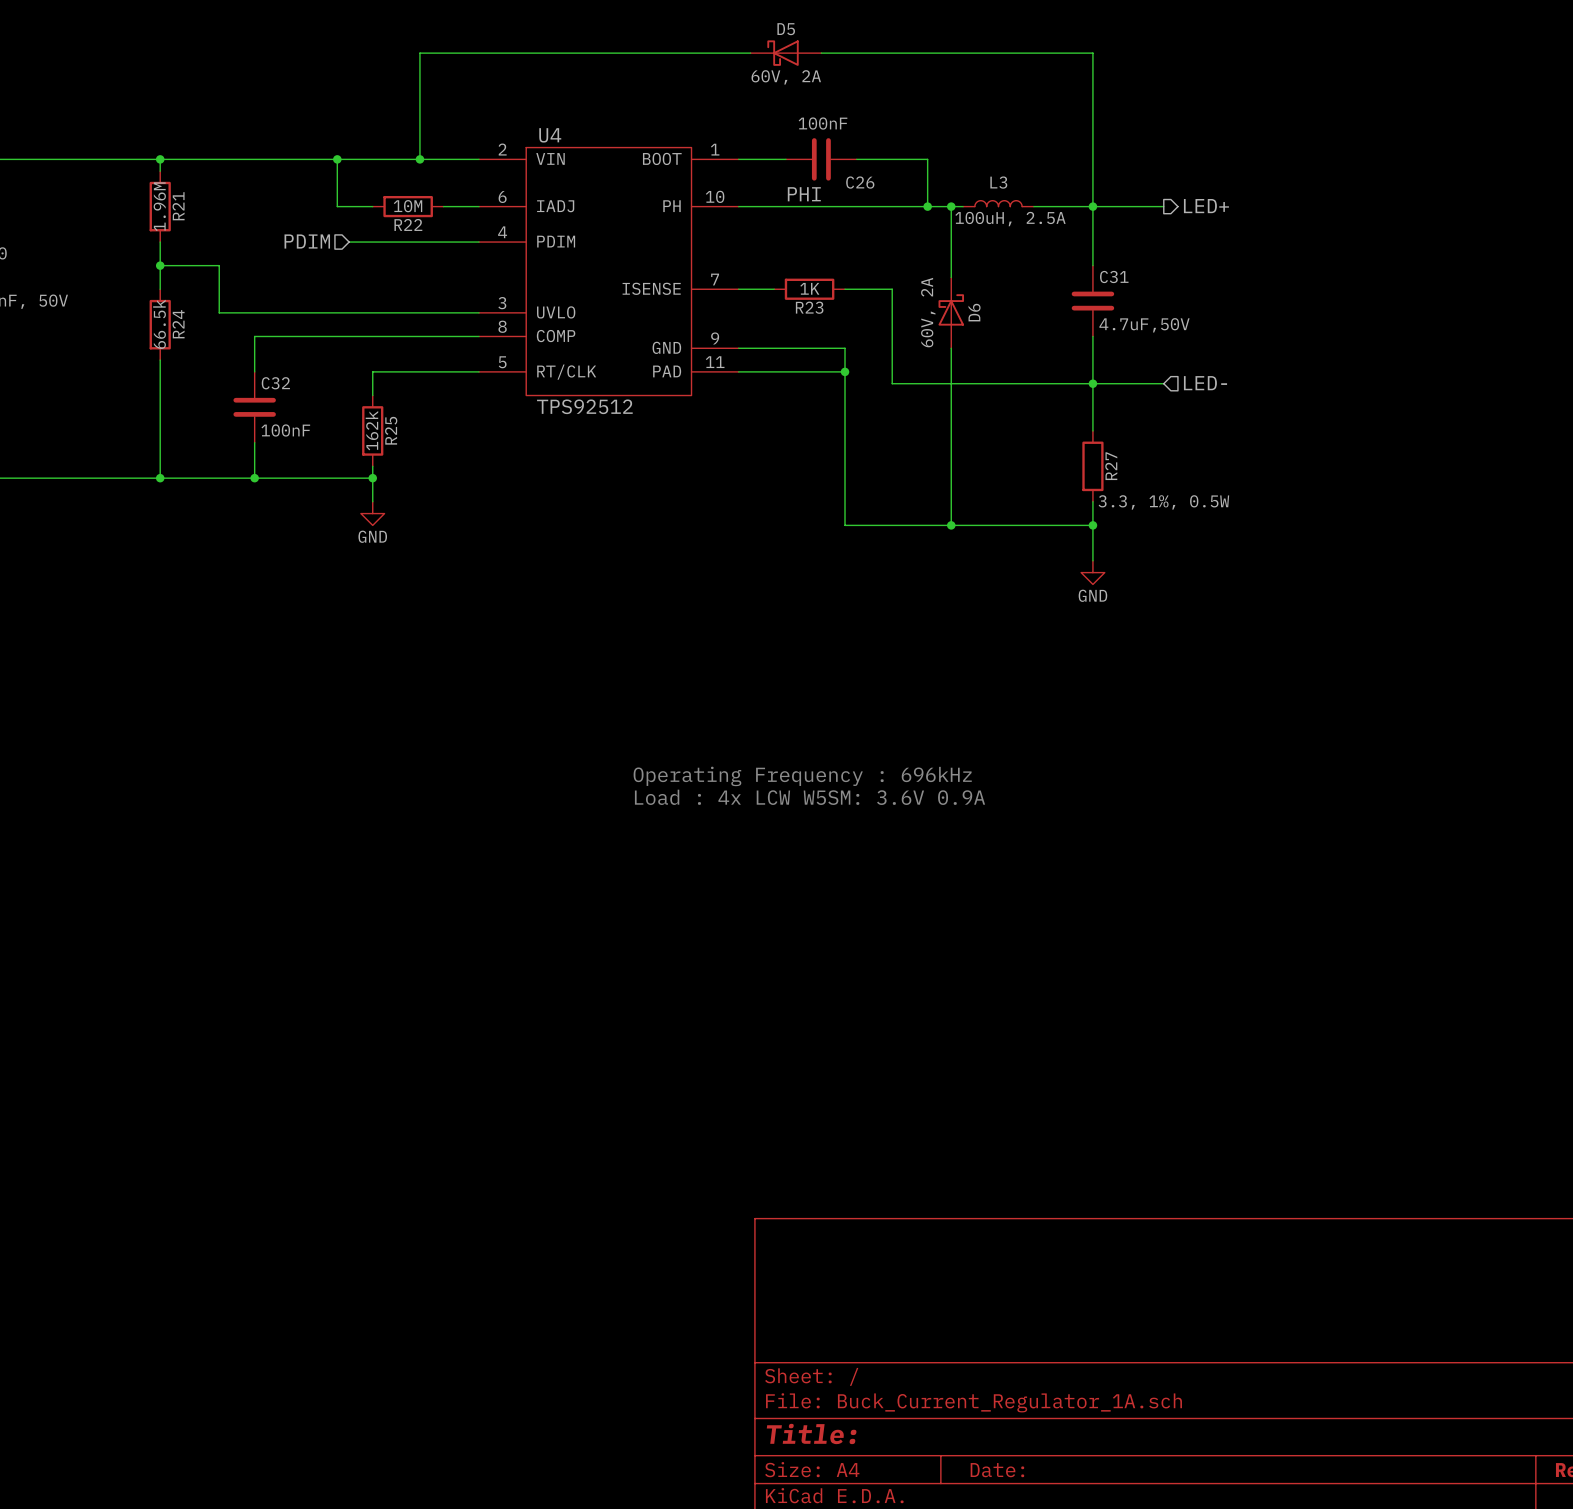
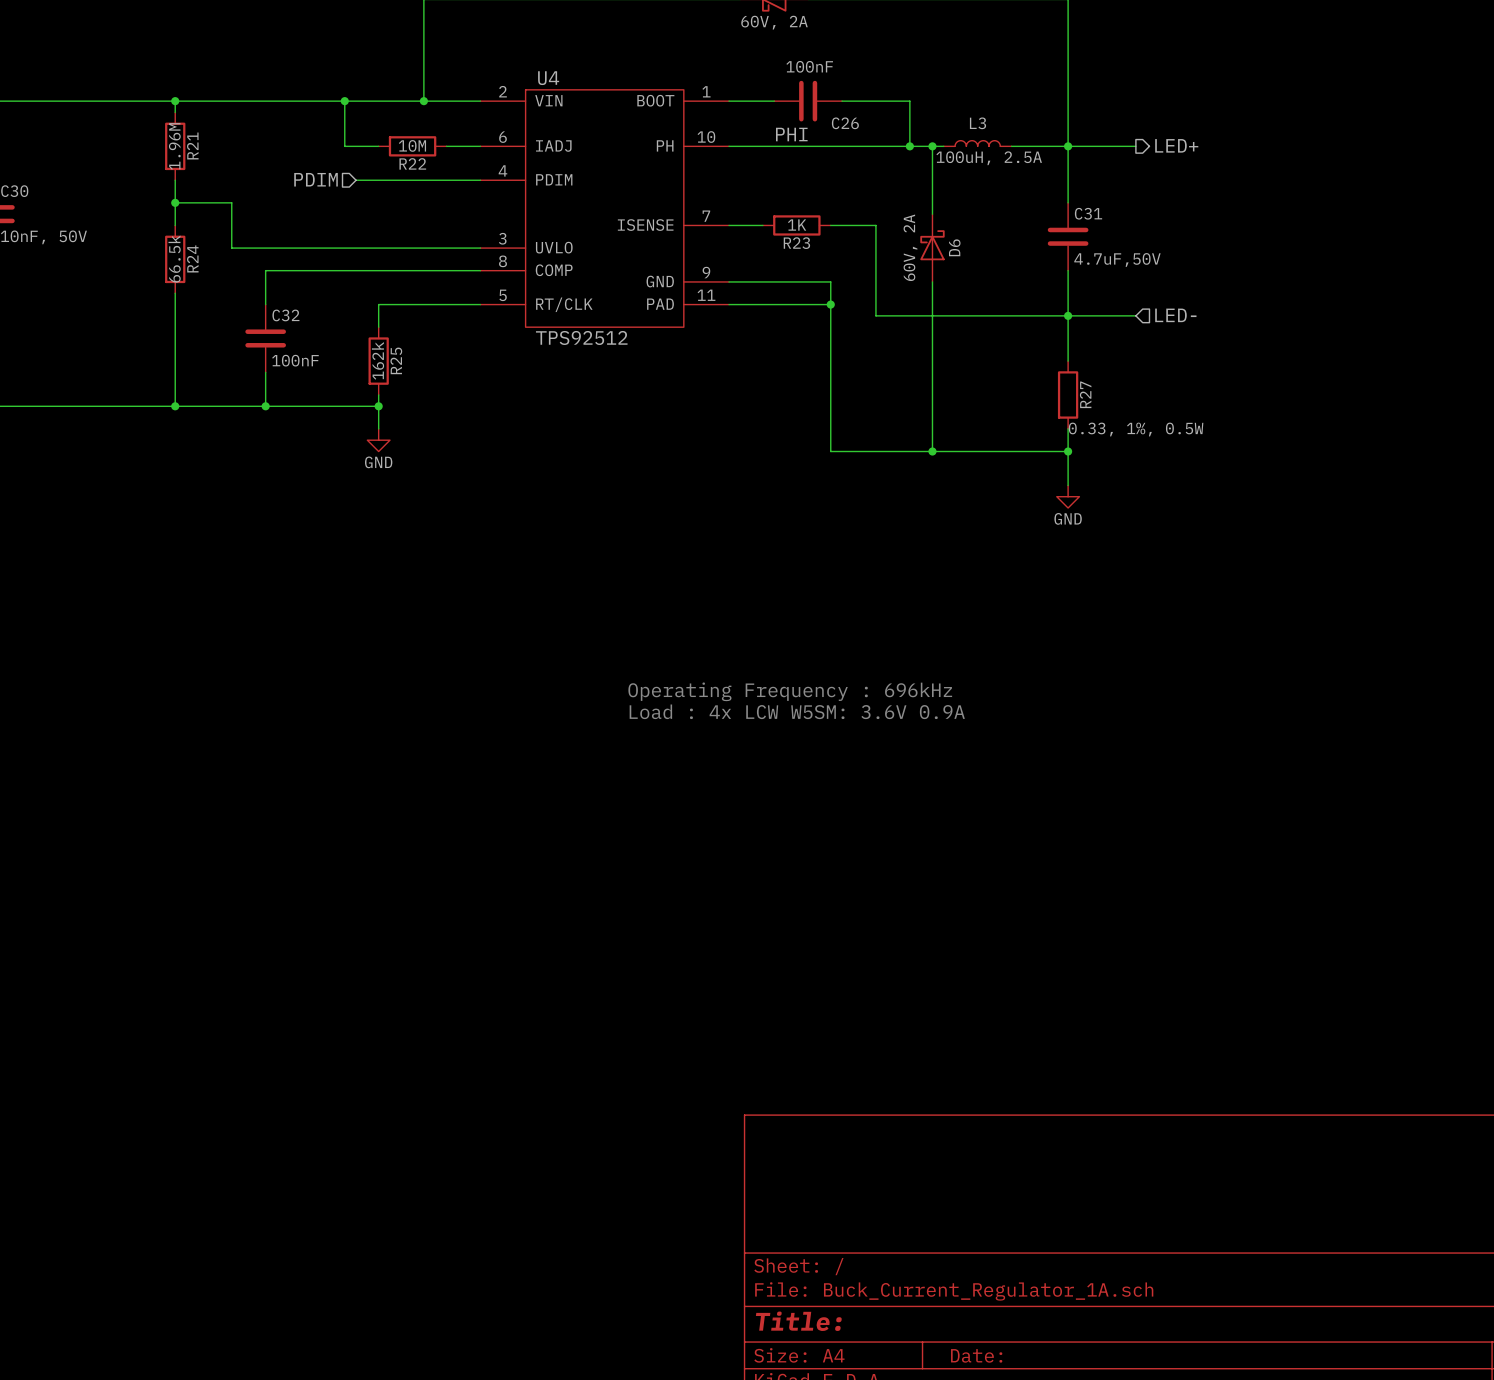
R27 value: 3.3, 1%, 0.5W (1163, 502) -> 0.33, 1%, 0.5W (1136, 429)

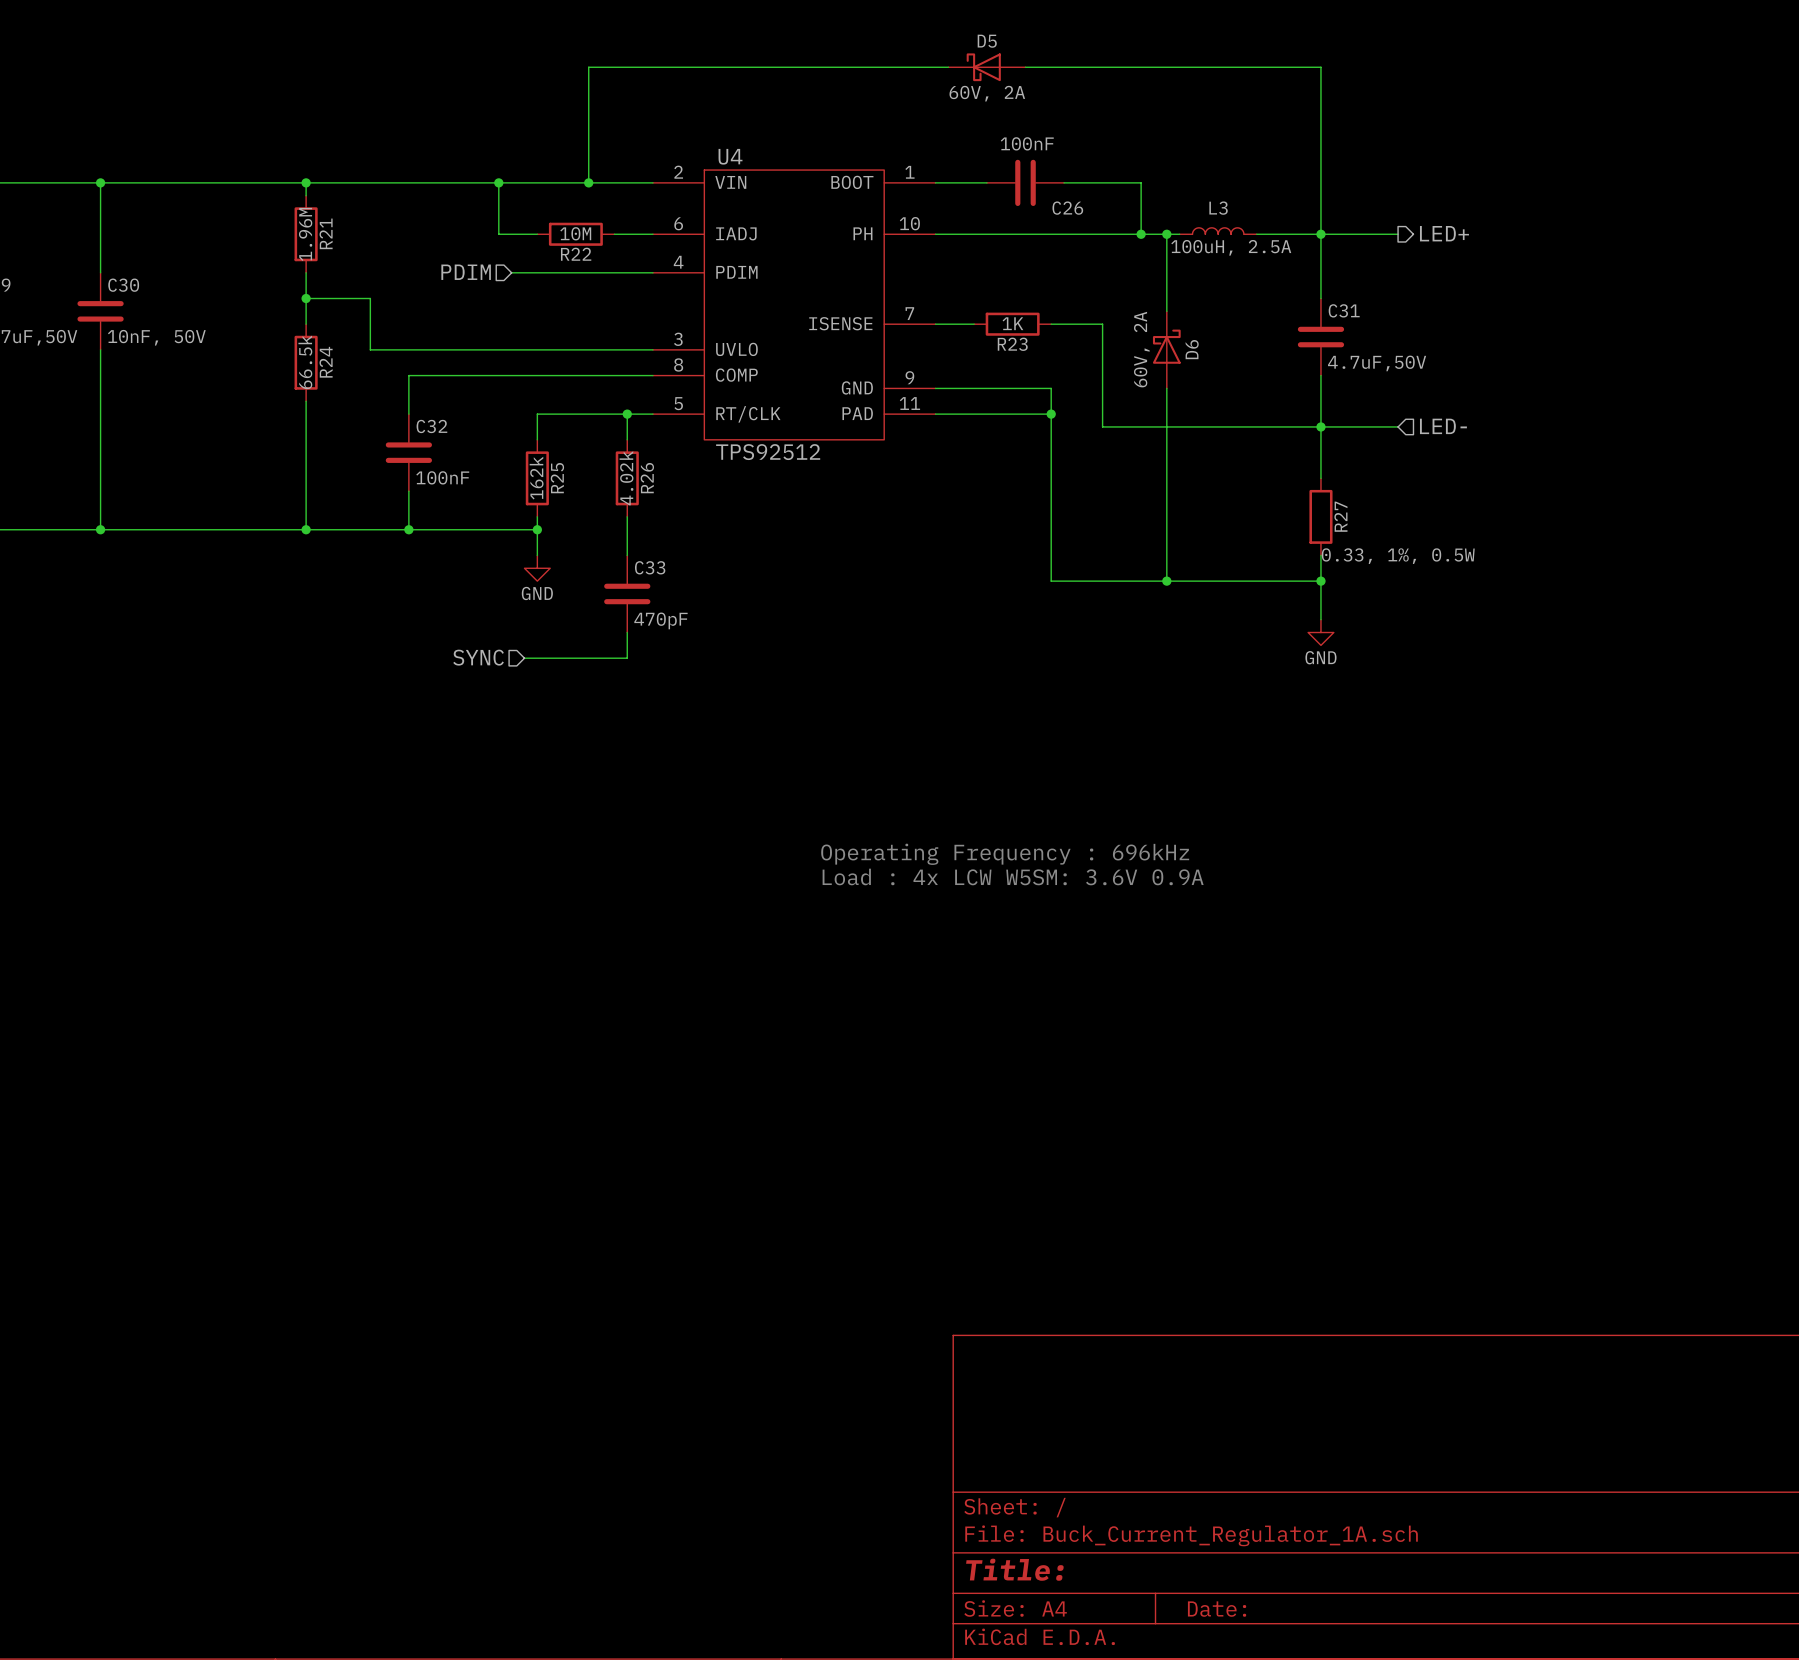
label: PHI (791, 134) -> none
wire: none -> (627, 414) (627, 439)
junction: none -> (627, 414)
R26: none -> 4.02k (627, 478)
wire: none -> (627, 516) (627, 555)
C33: none -> 470pF (627, 593)
wire: none -> (627, 632) (627, 658) (524, 658)
hierarchical label: none -> SYNC (478, 657)

